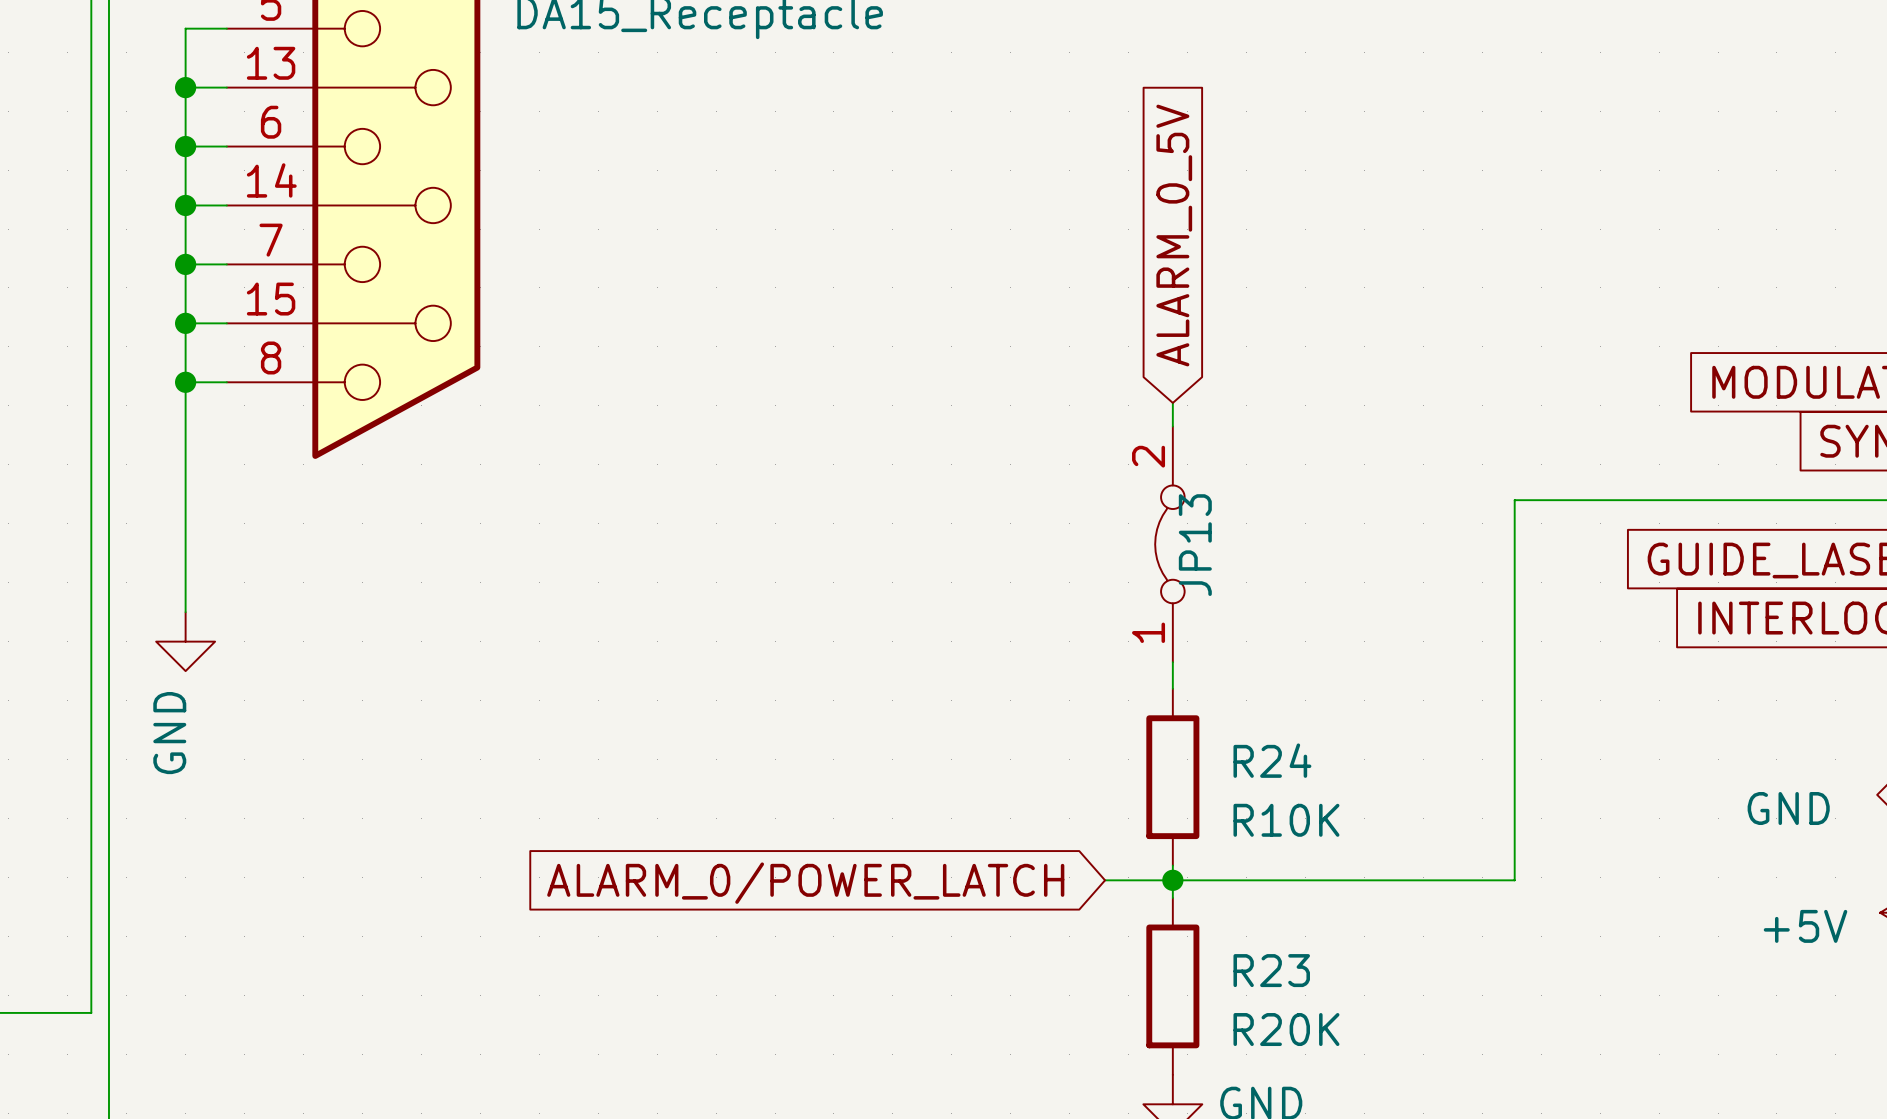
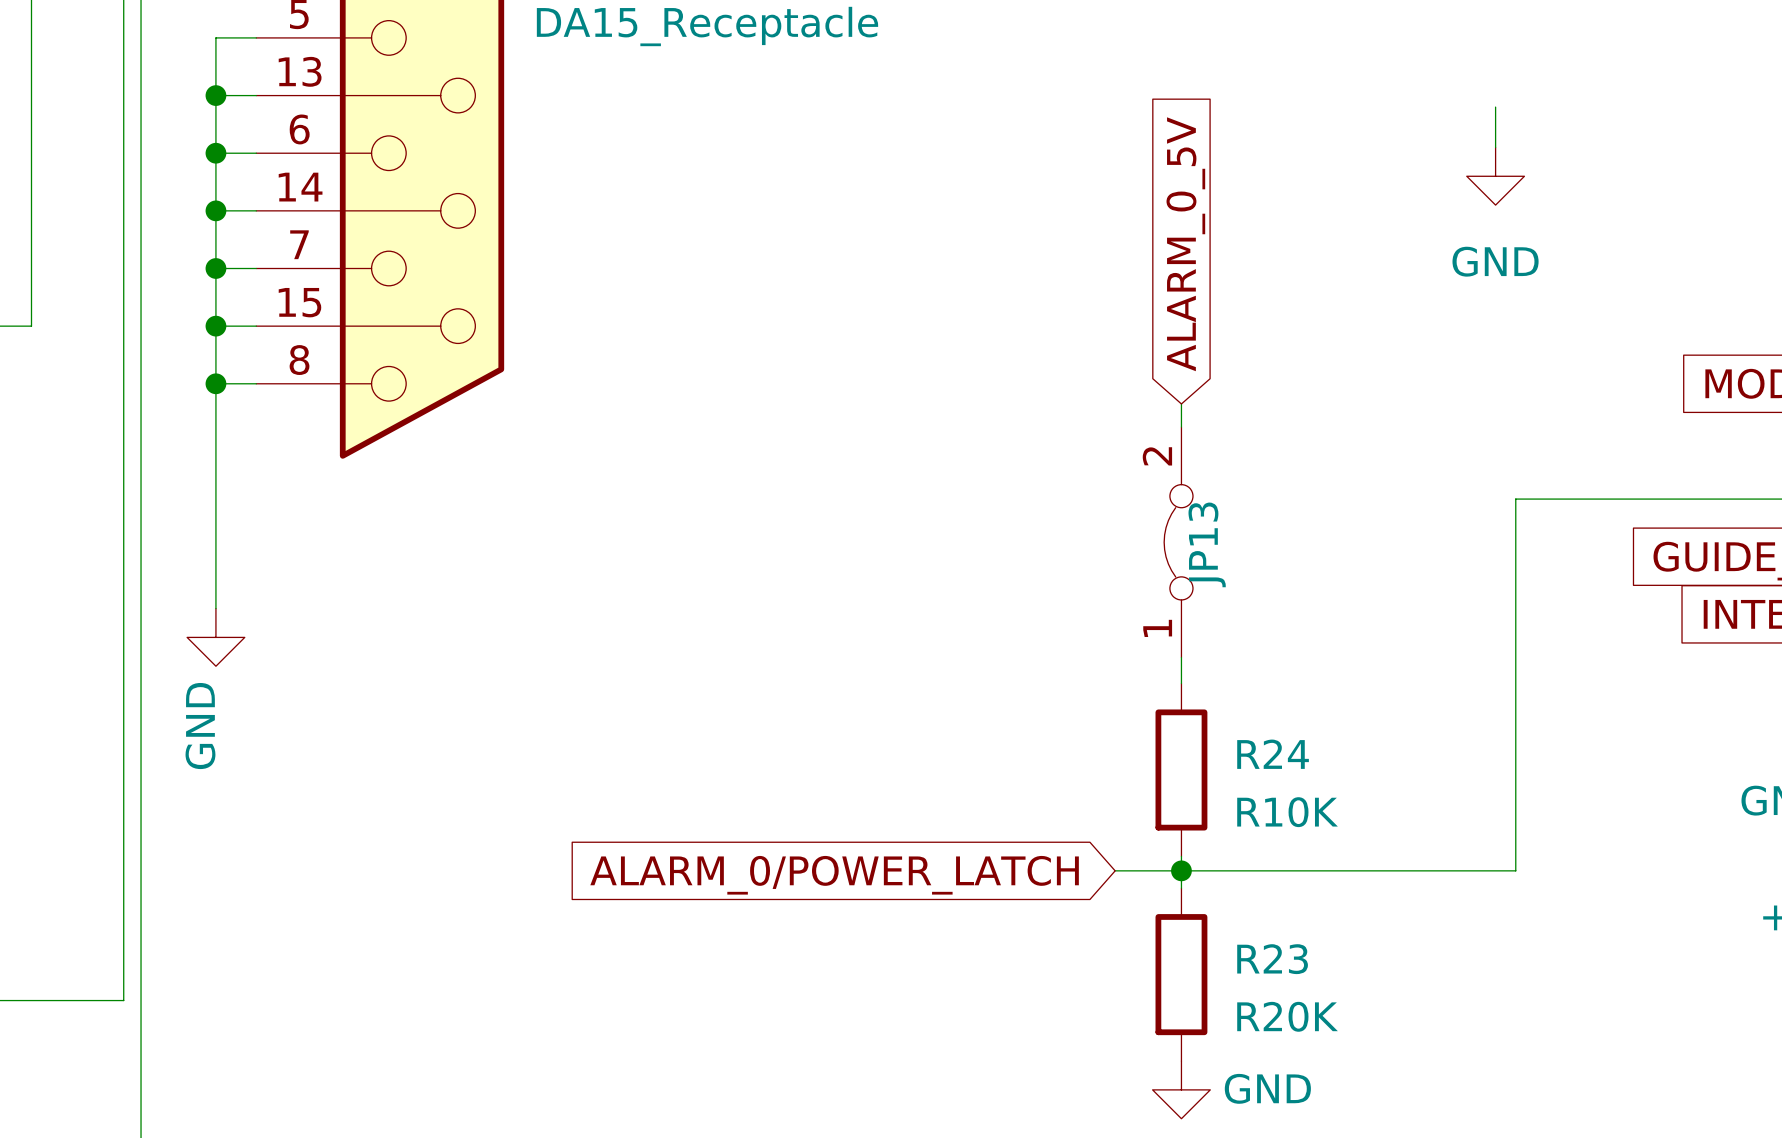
wire: none -> (1495, 107) (1495, 147)
power symbol: none -> GND (1495, 176)

